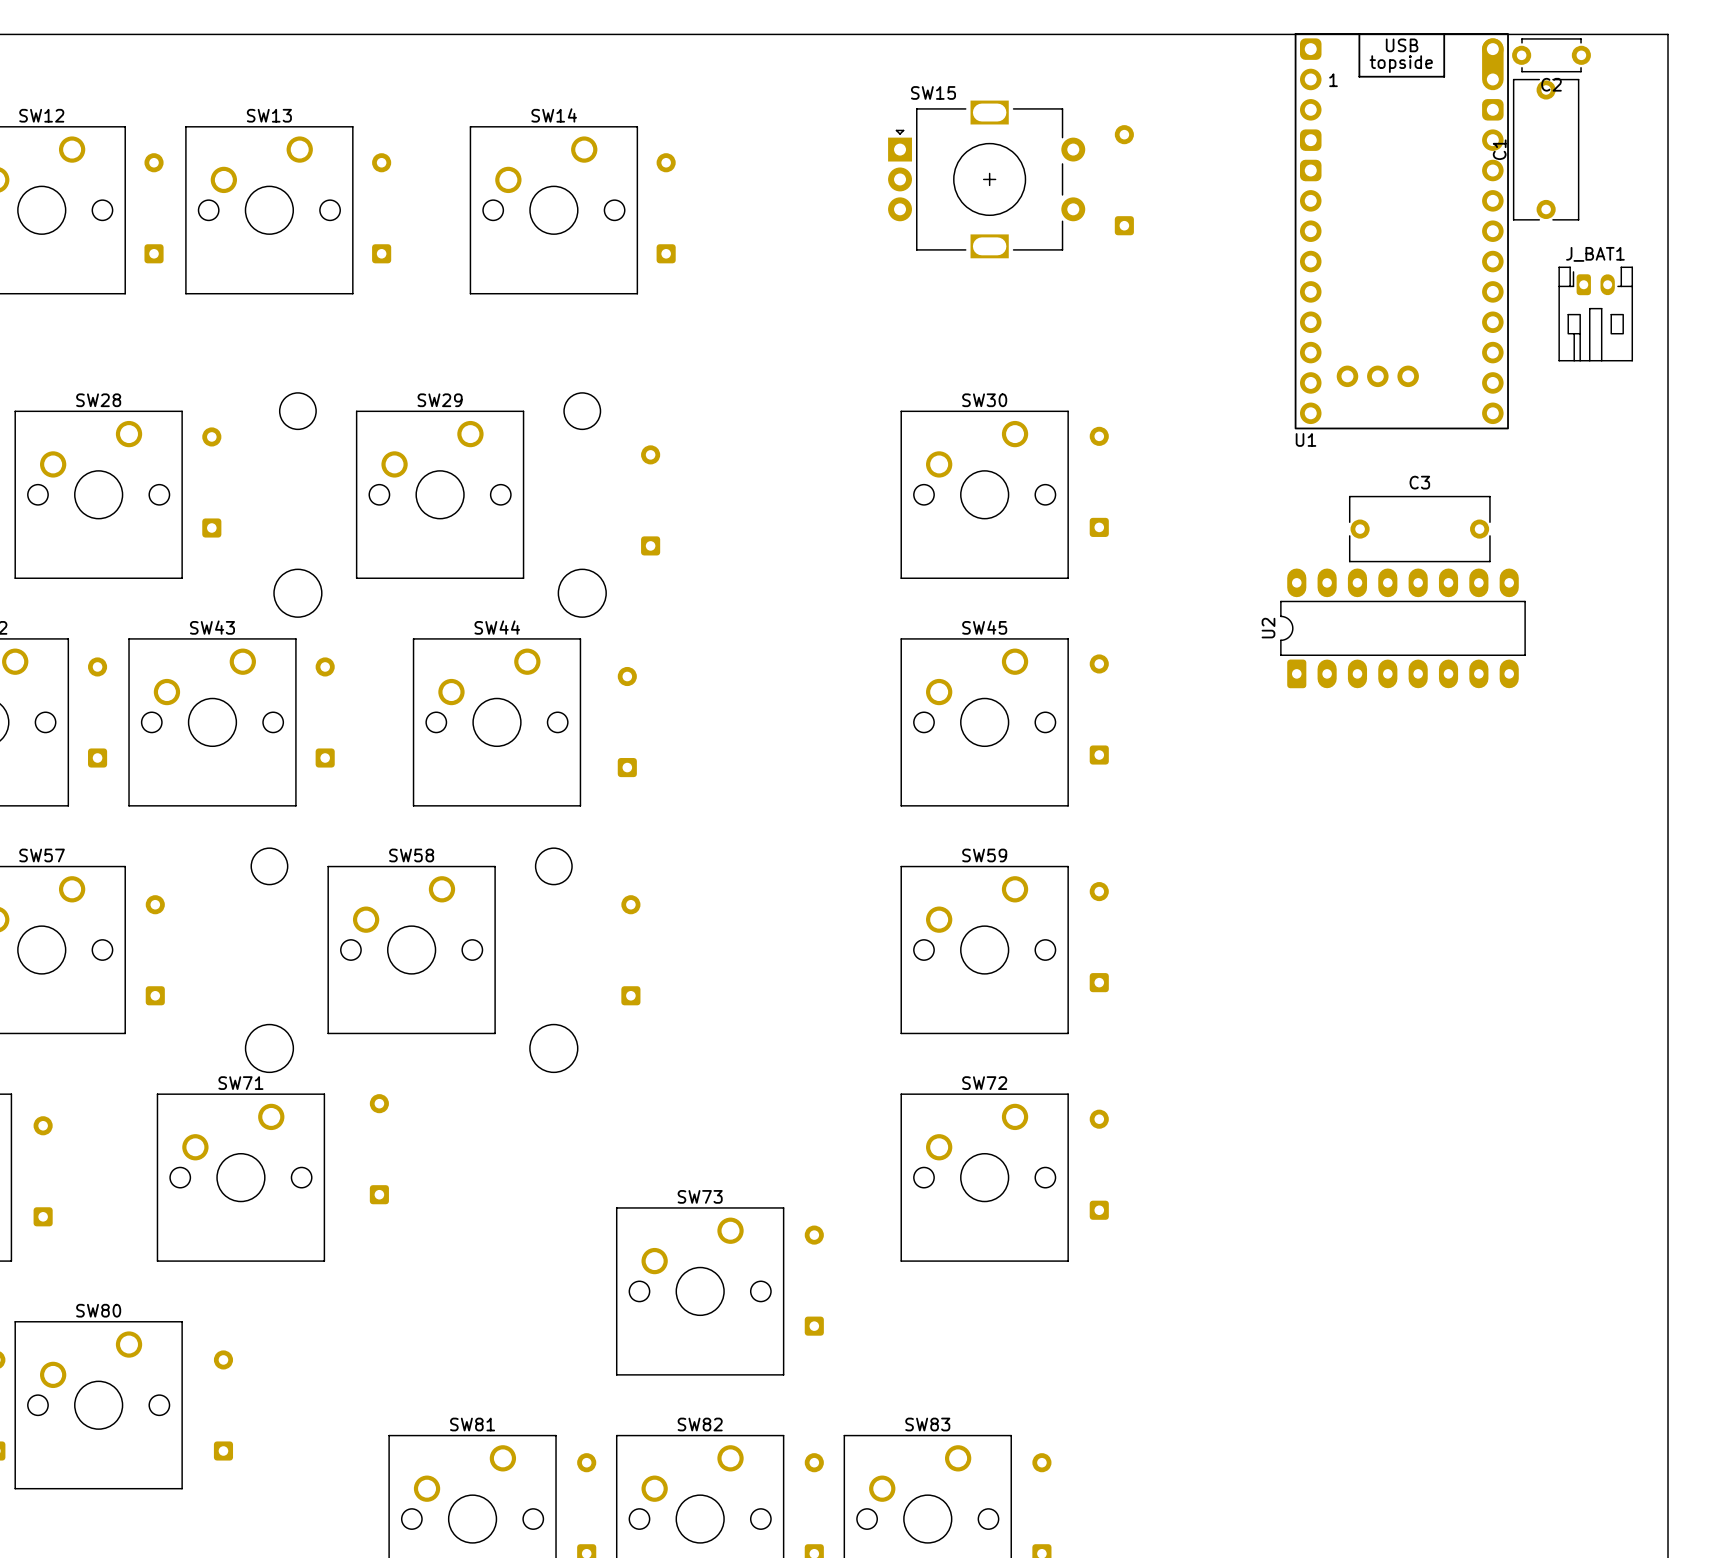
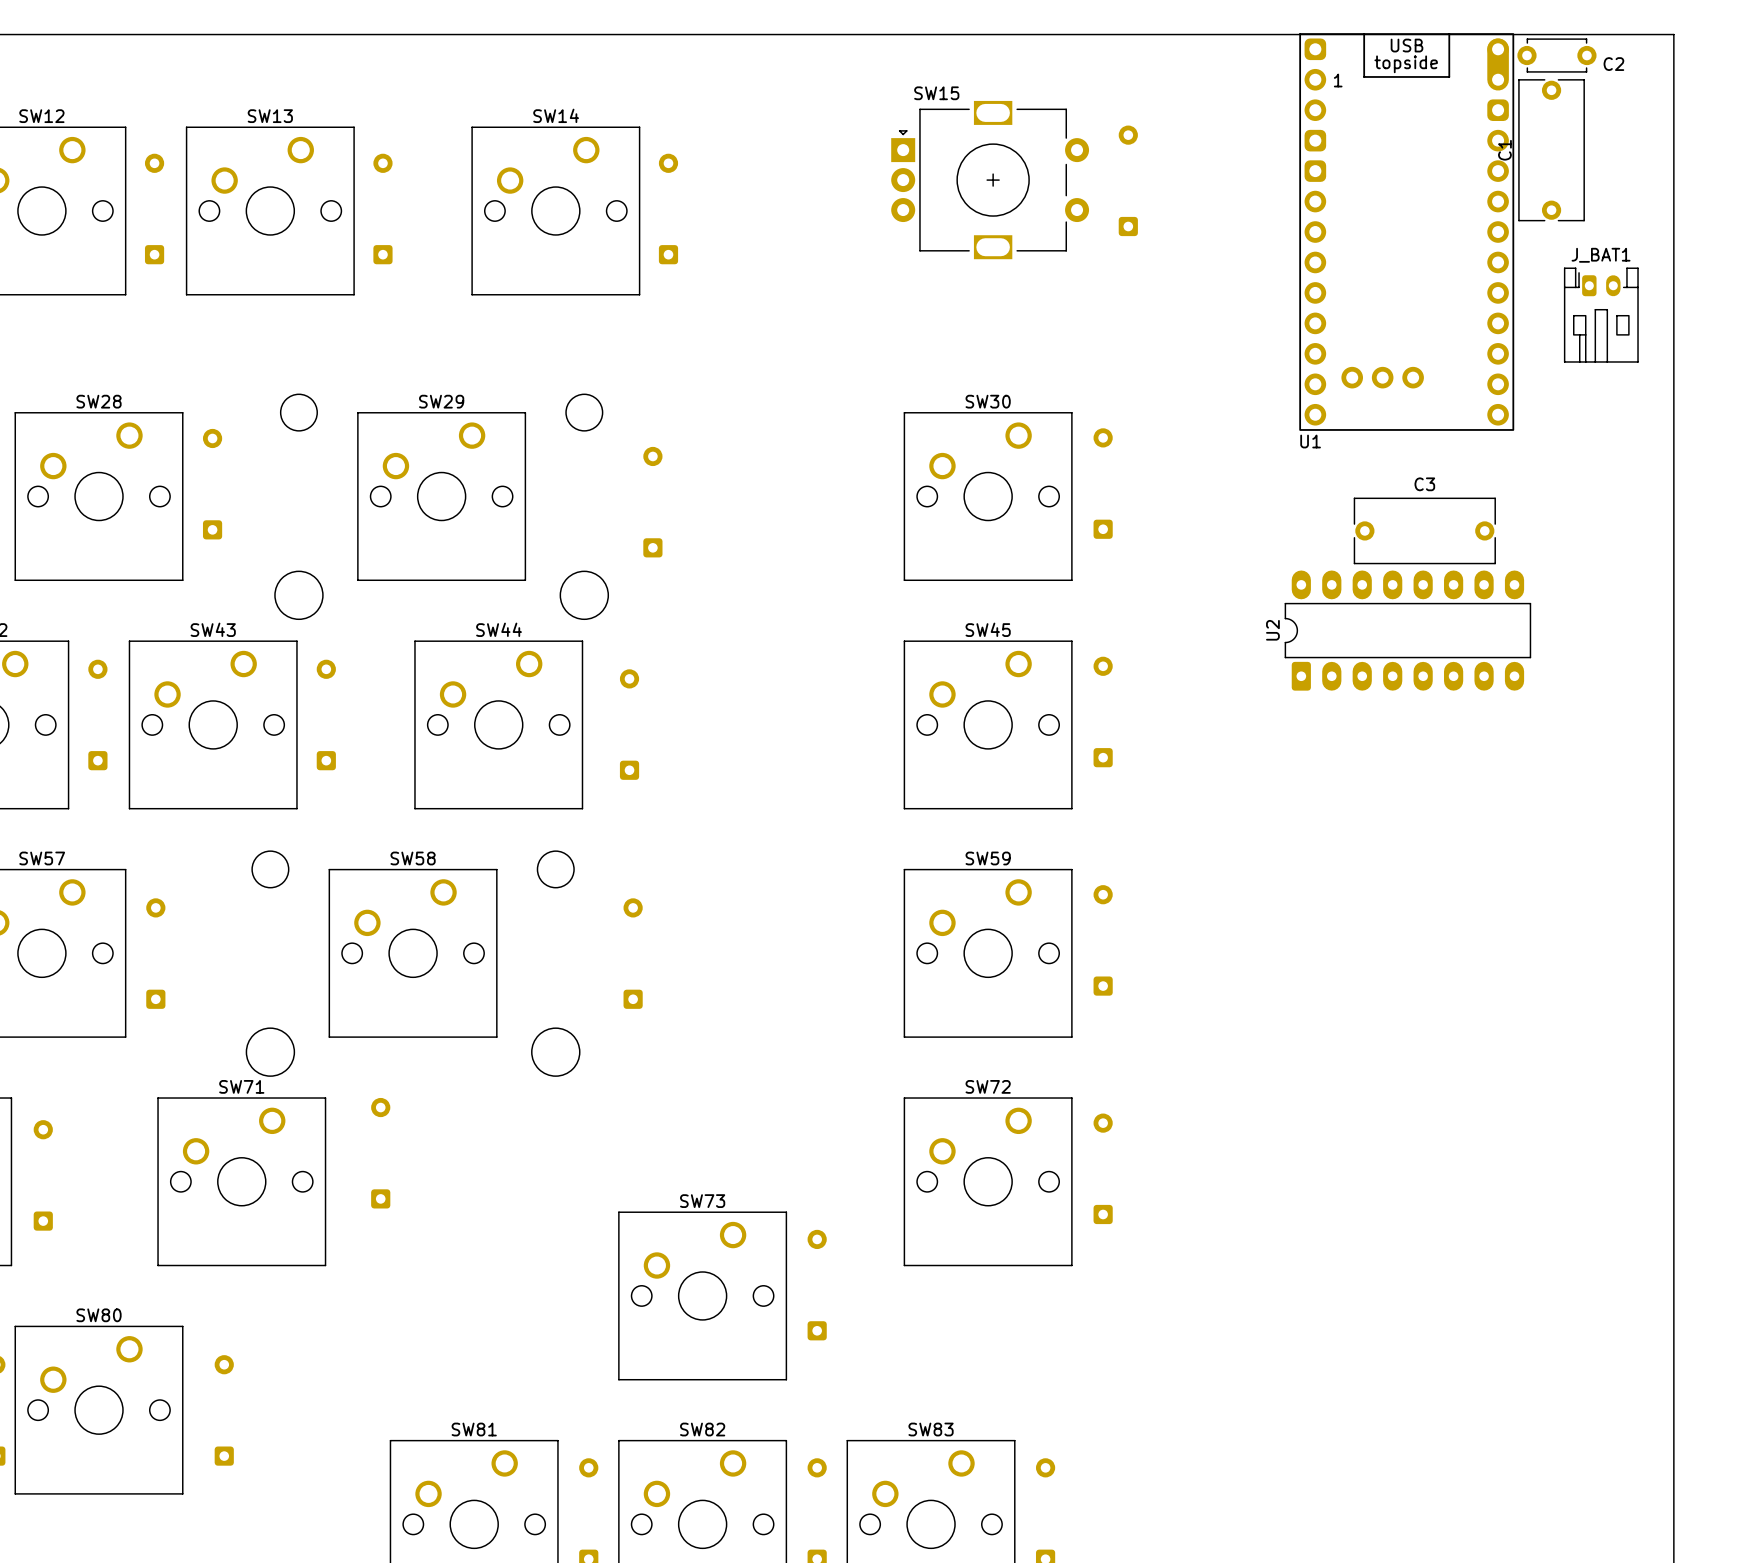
C2 name position: C2 (1551, 84) -> C2 (1613, 64)

